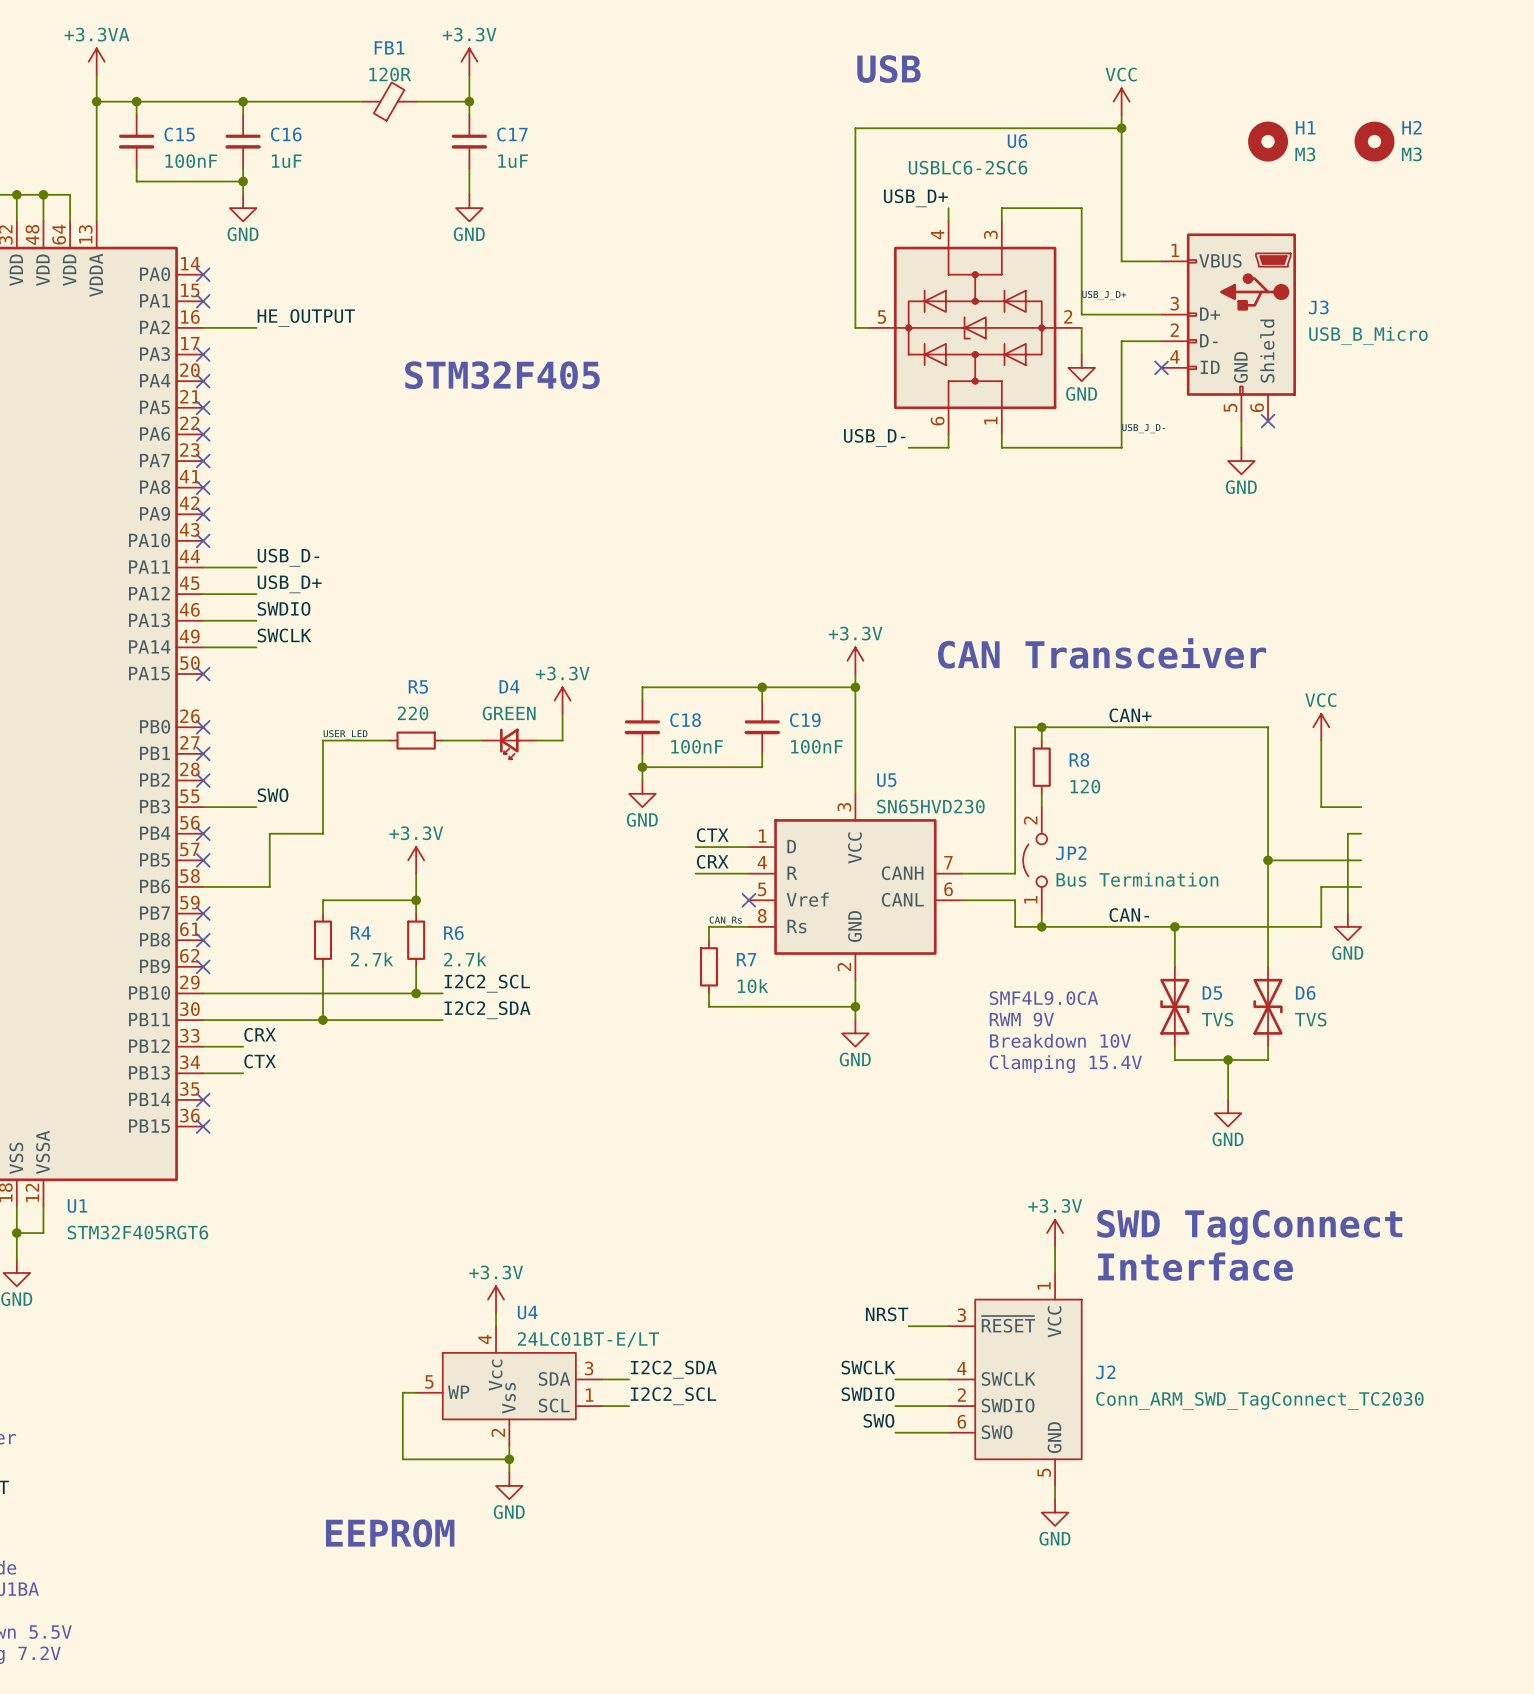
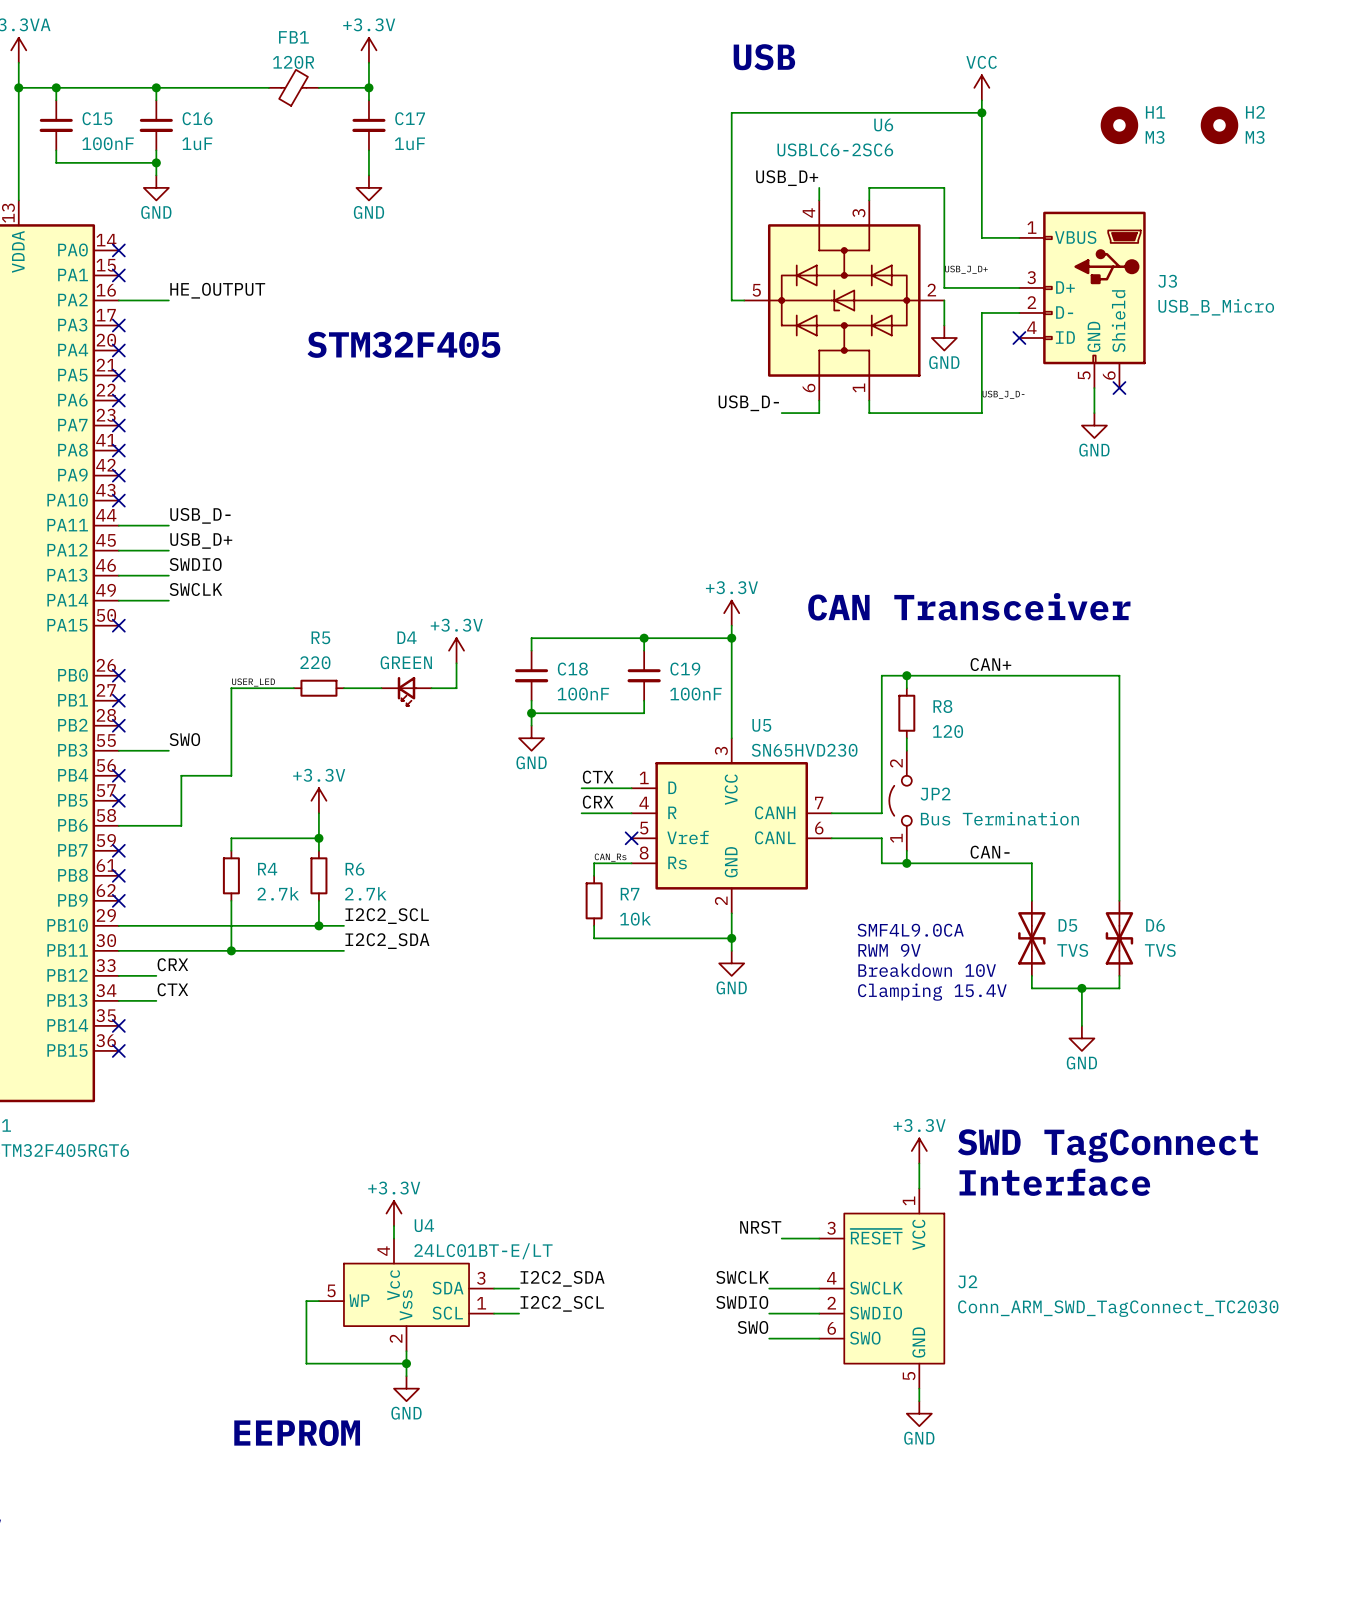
power symbol: VCC (1321, 727) -> none
wire: (1321, 740) (1321, 807) (1361, 807) -> none
wire: (1361, 833) (1347, 833) (1347, 913) -> none
wire: (1268, 860) (1361, 860) -> none
junction: (1268, 860) -> none
wire: (1361, 886) (1321, 886) (1321, 926) (1174, 926) -> none
junction: (1174, 926) -> none
power symbol: GND (1347, 926) -> none

